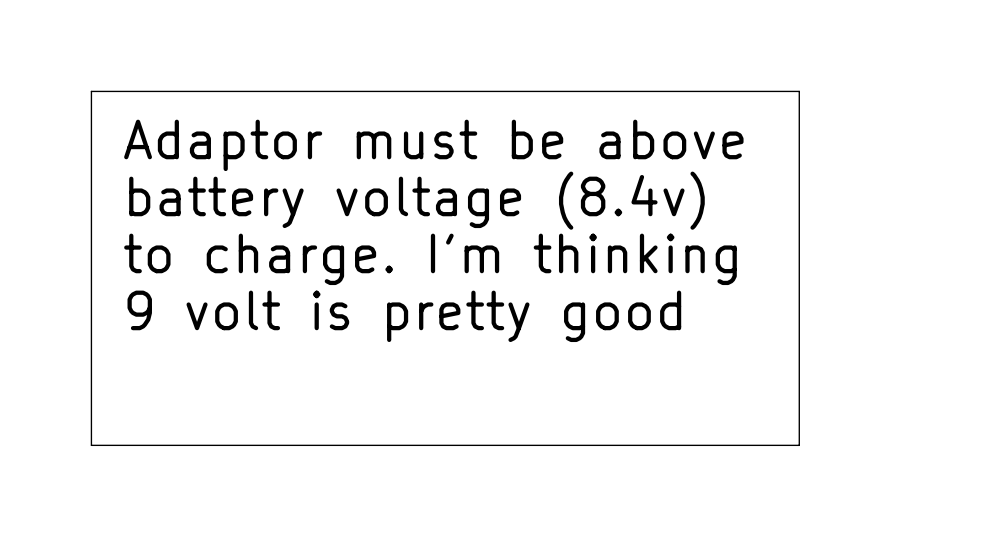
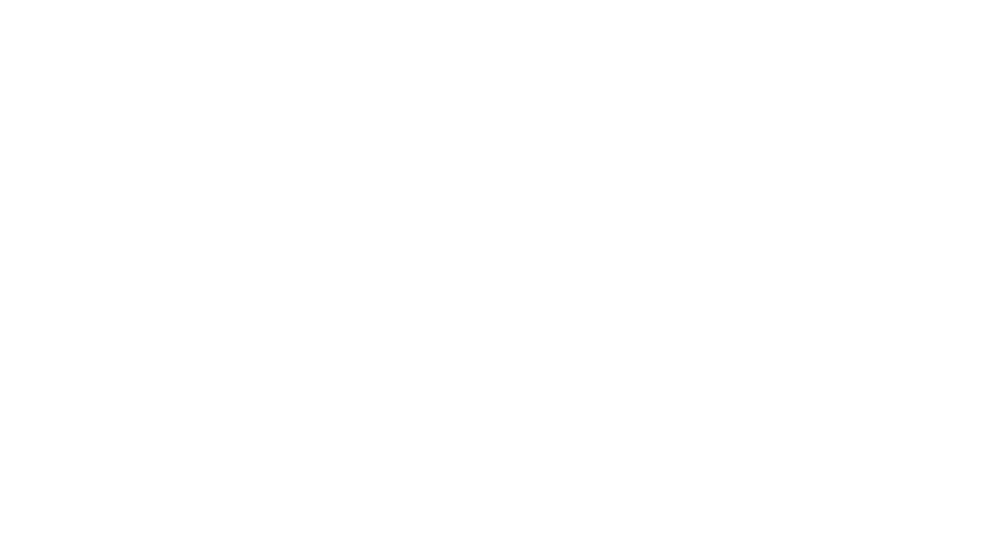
line: (91, 91) (799, 91) (799, 445) (91, 445) (91, 91) -> none
text: Adaptor must be above (433, 145) -> none
text: battery voltage (8.4v) (416, 200) -> none
text: to charge. I'm thinking (430, 259) -> none
text: 9 volt is pretty good (404, 316) -> none

